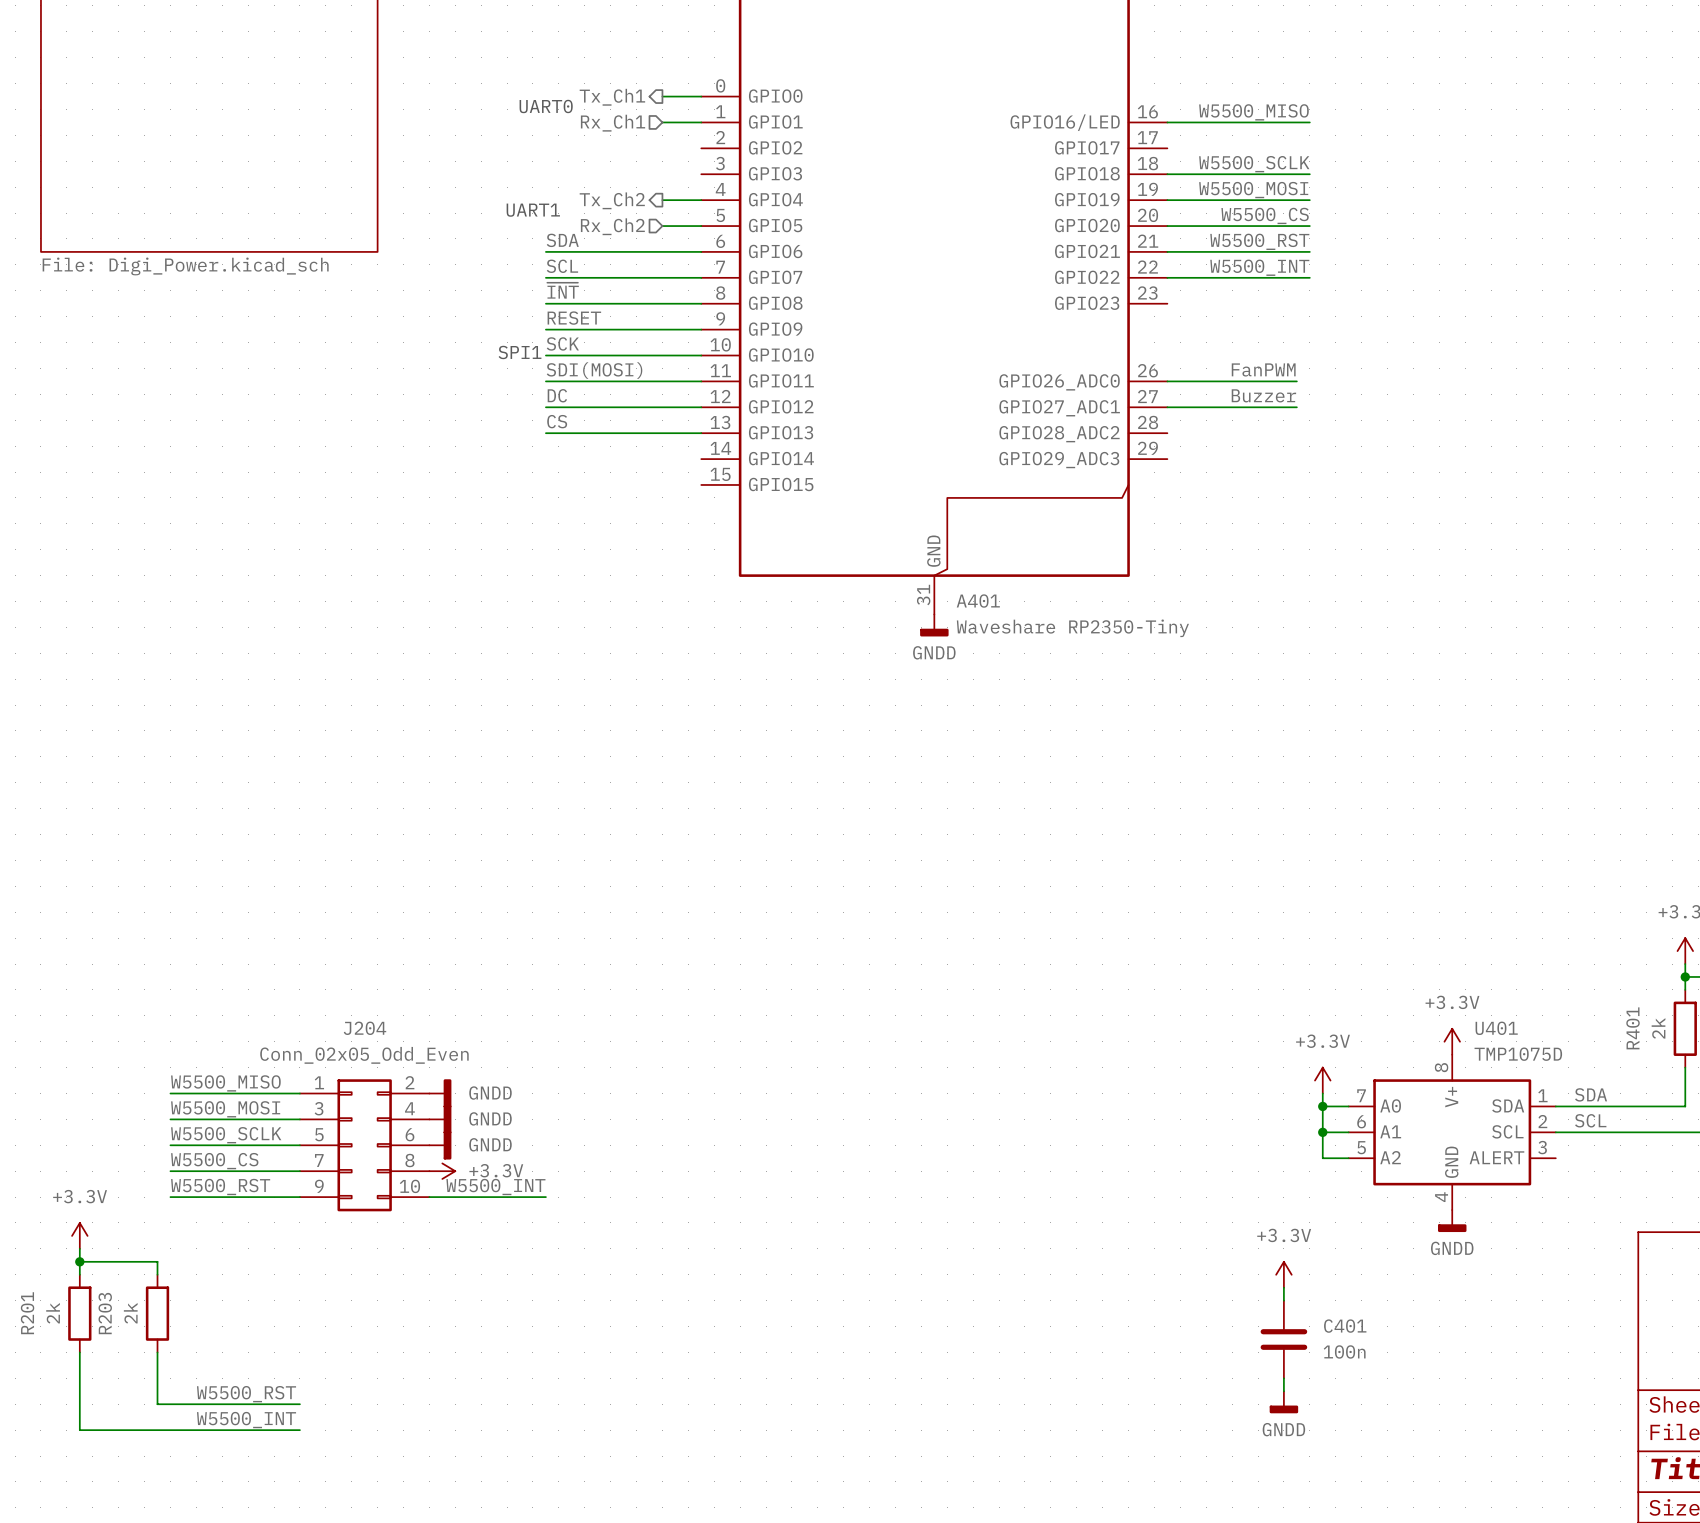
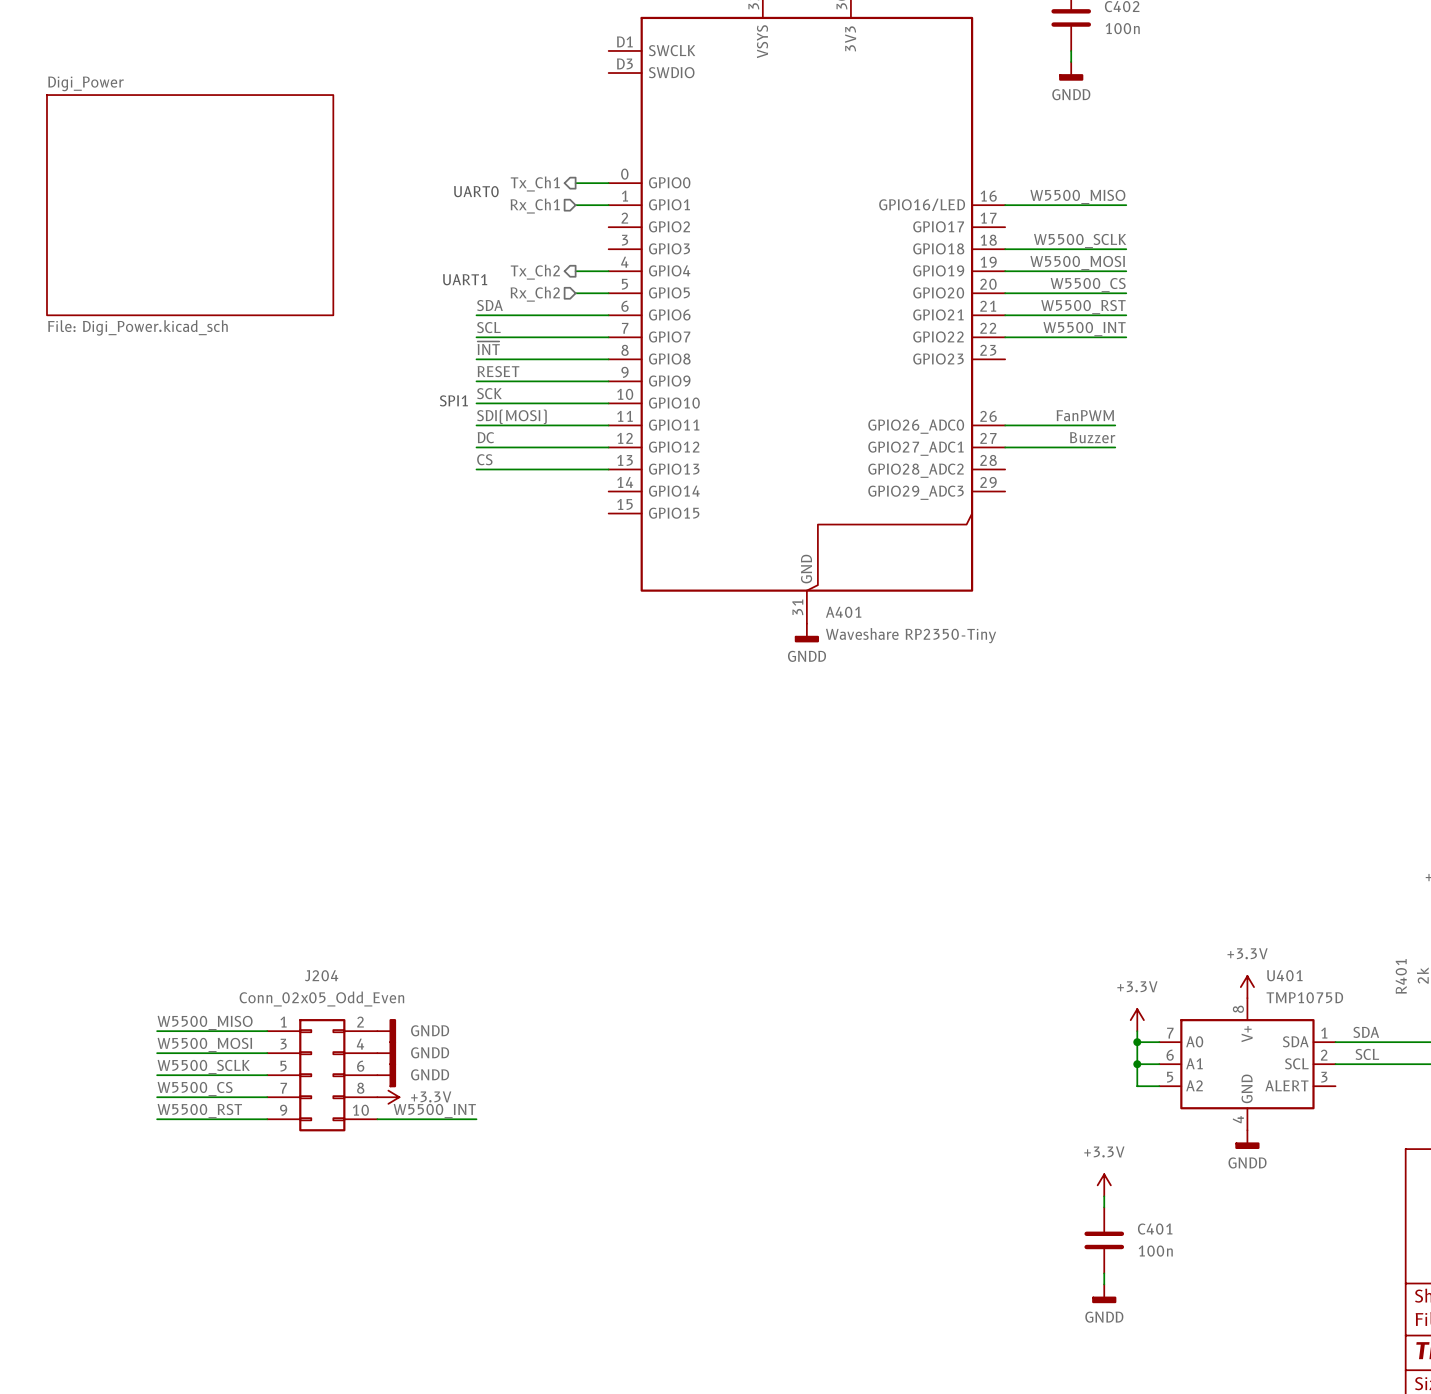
power symbol: +3.3V (79, 1235) -> none
wire: (79, 1248) (79, 1274) -> none
wire: (79, 1261) (157, 1261) (157, 1274) -> none
junction: (79, 1261) -> none
R201: 2k (79, 1313) -> none
R203: 2k (157, 1313) -> none
wire: (79, 1352) (79, 1430) (299, 1430) -> none
wire: (157, 1352) (157, 1404) (299, 1404) -> none
label: W5500_RST (246, 1394) -> none
label: W5500_INT (246, 1420) -> none

